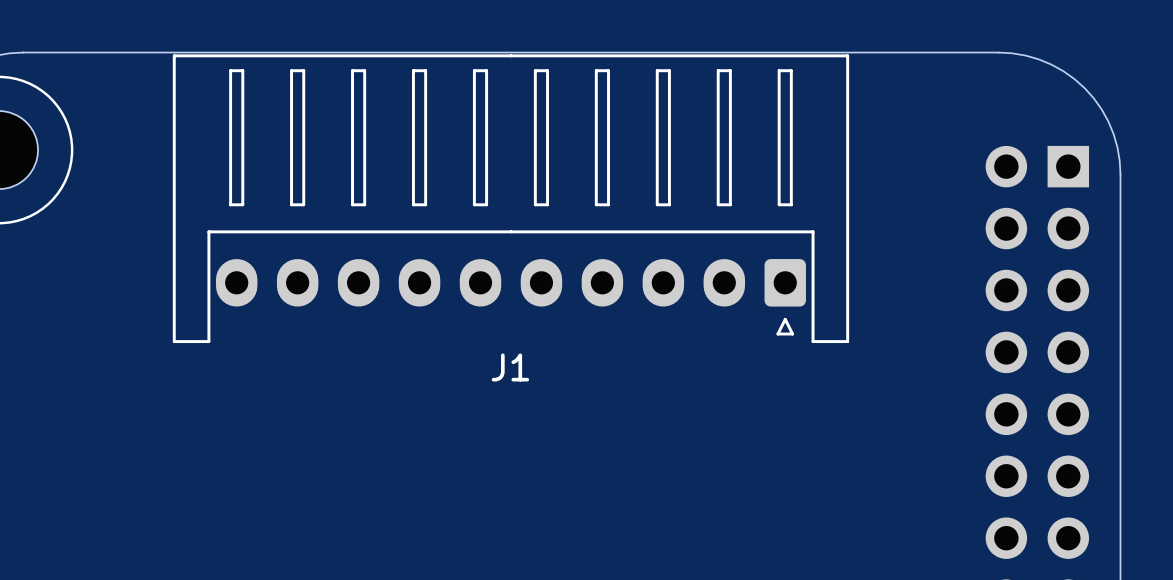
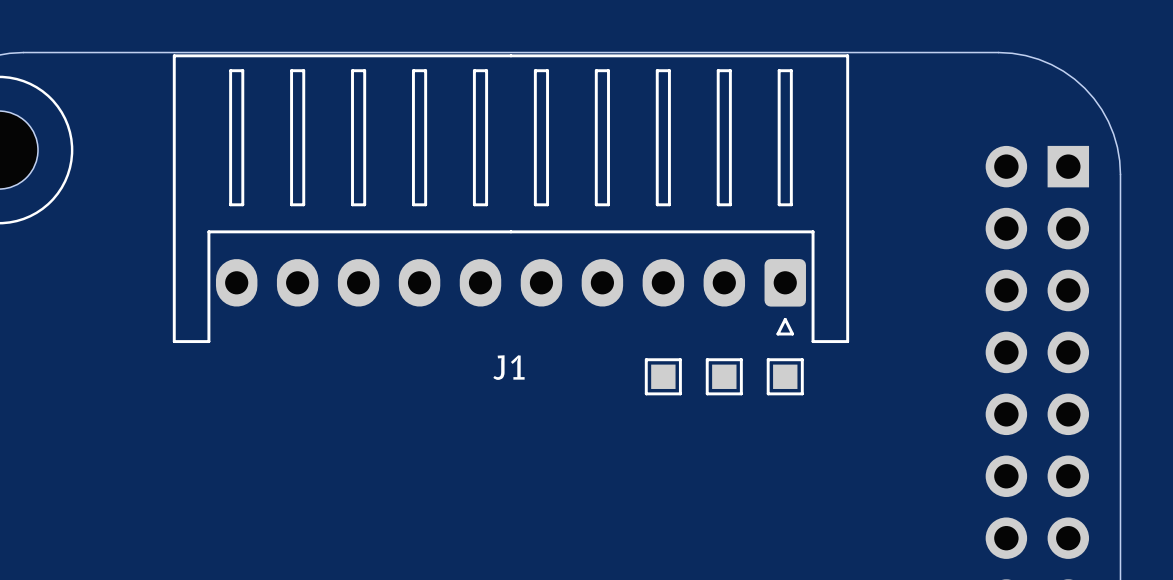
part: none -> (663, 376)
part: none -> (724, 376)
part: none -> (785, 376)

